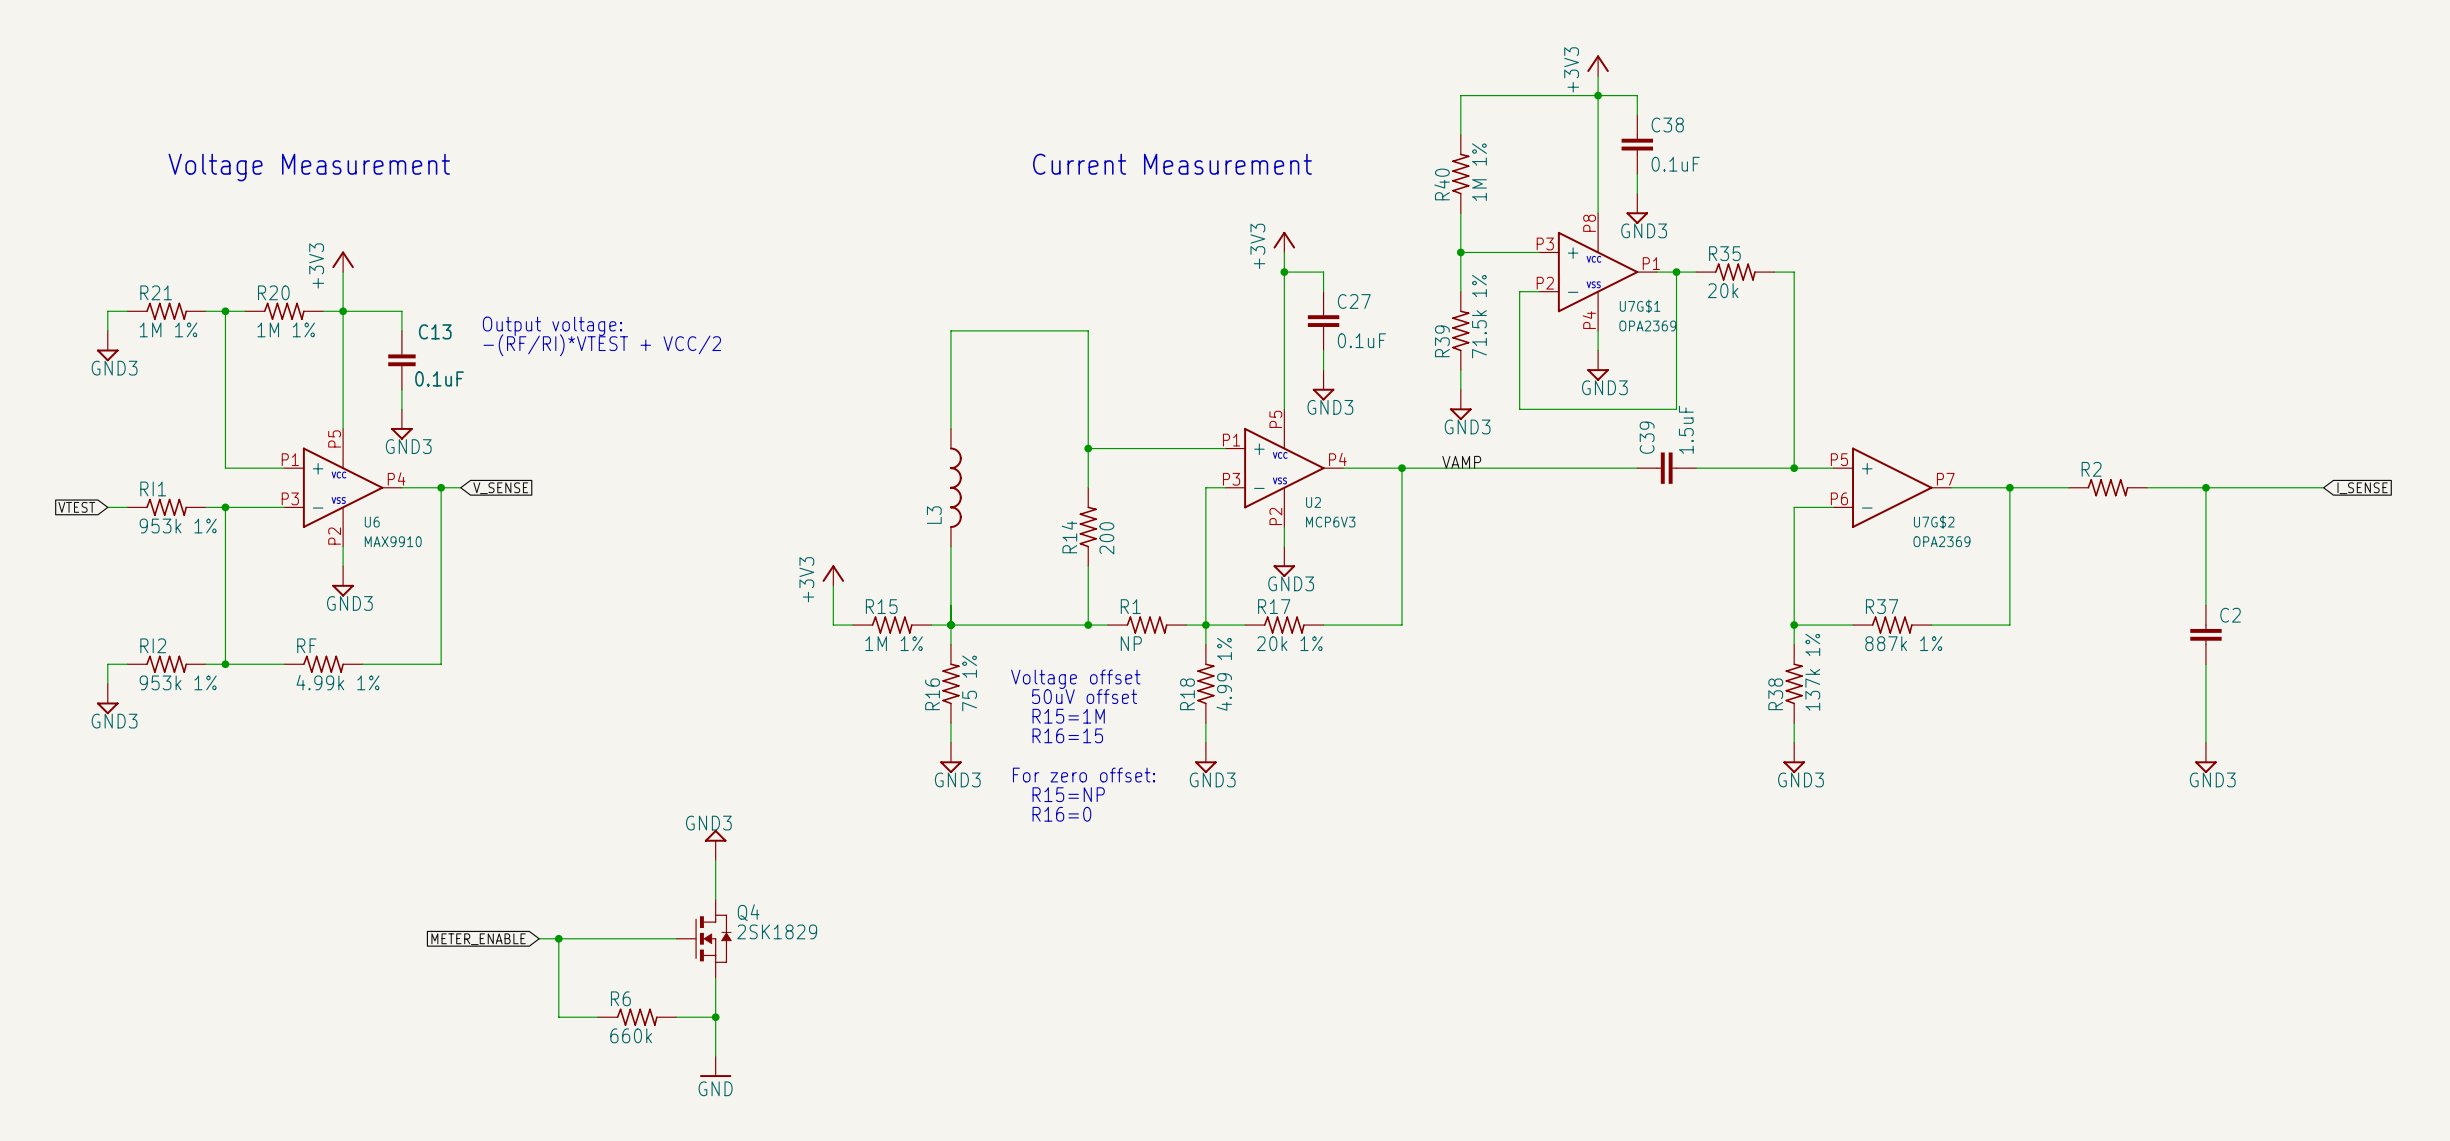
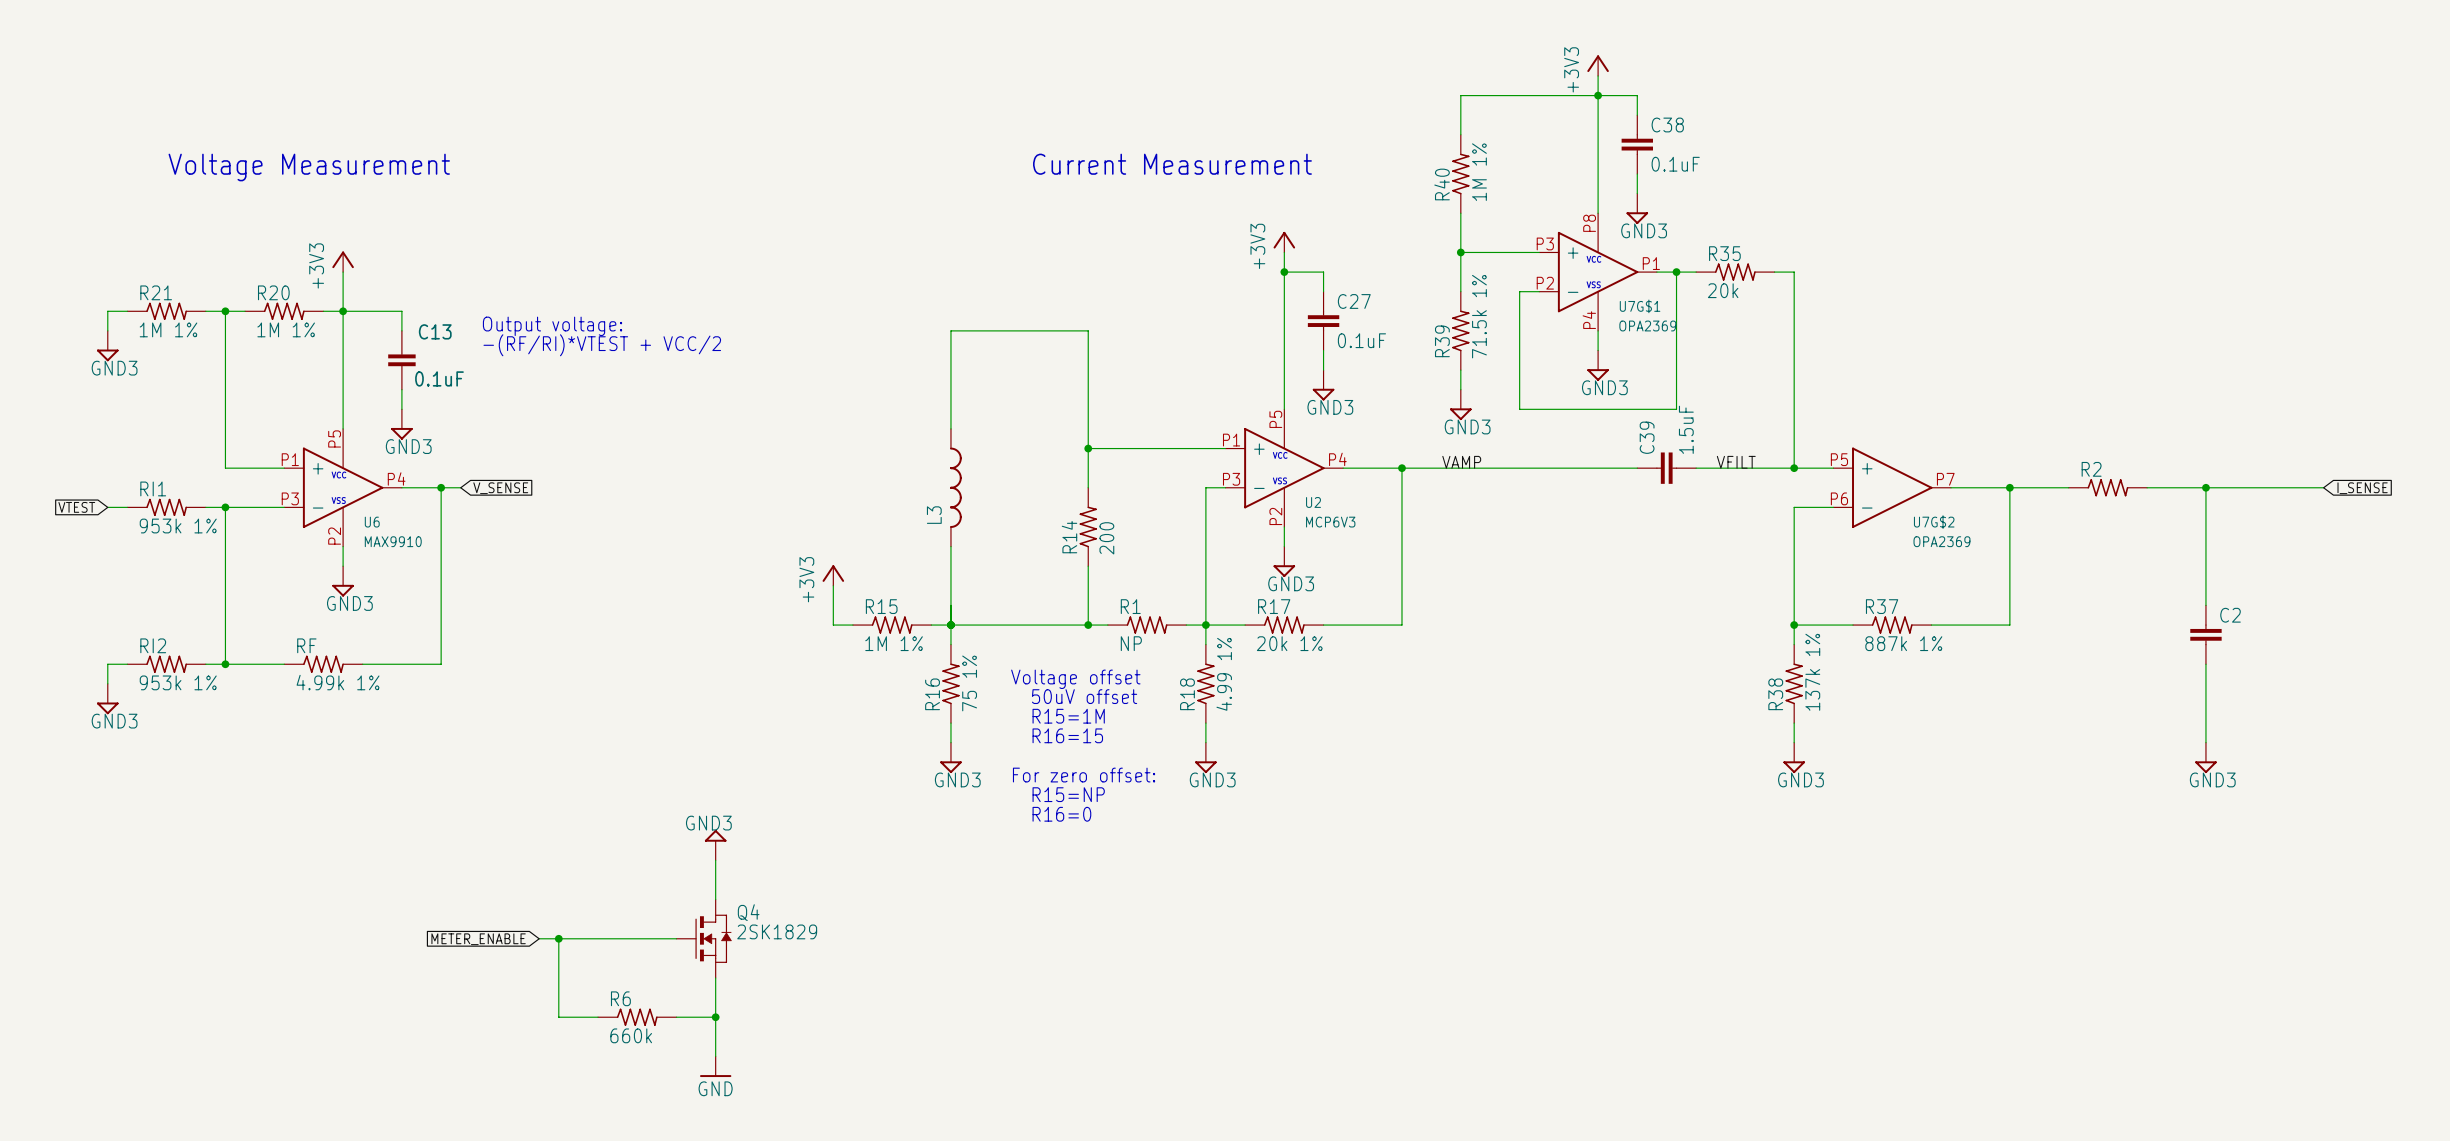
label: none -> VFILT (1736, 462)

